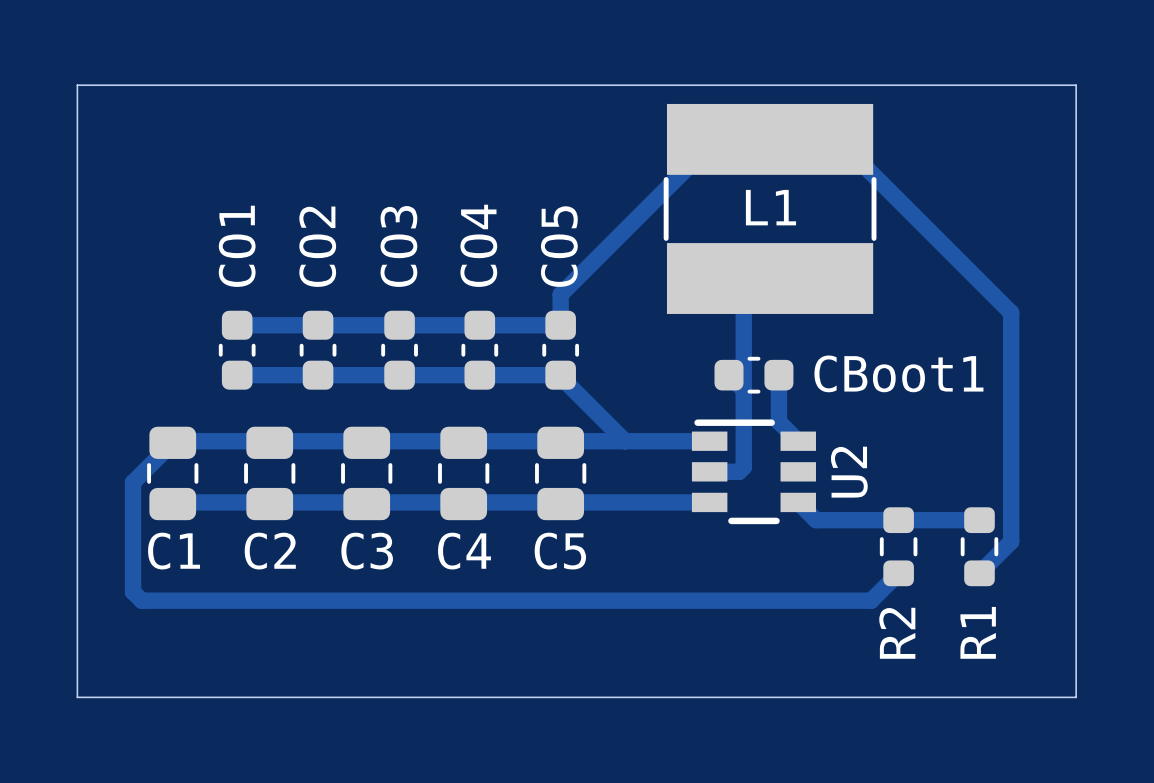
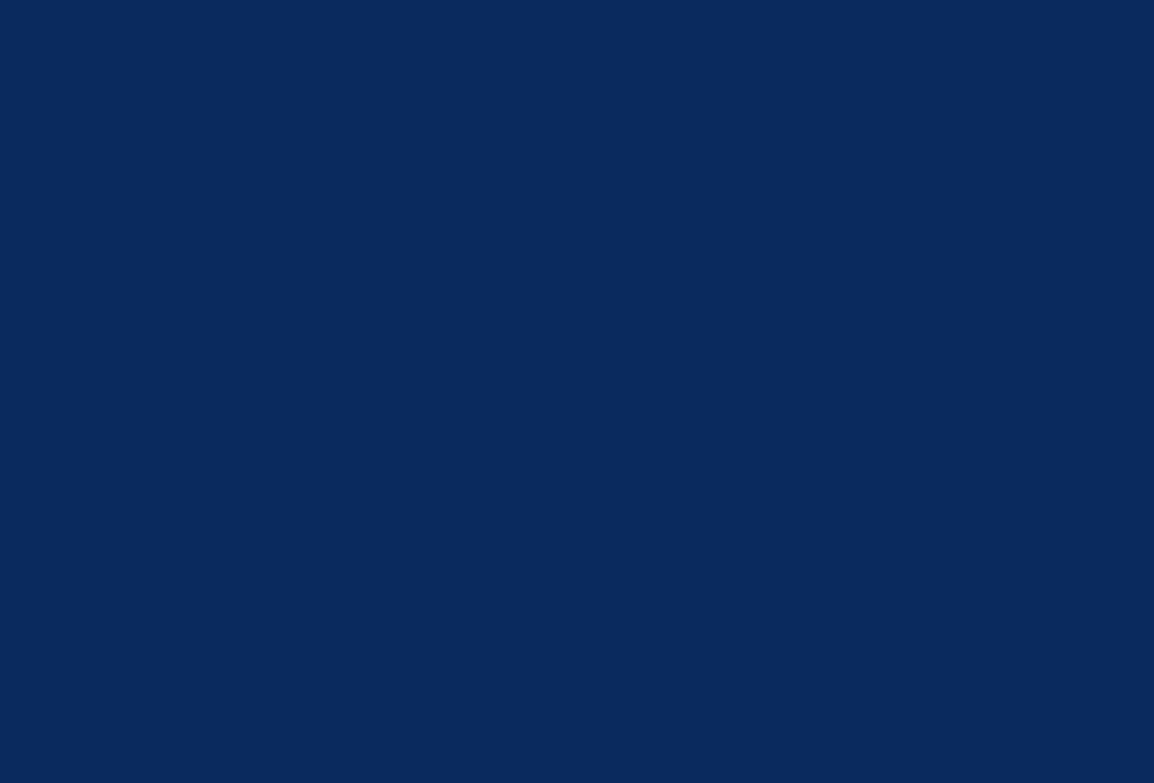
board edge: (77, 85) (1076, 85) (1076, 697) (77, 697) (77, 85) -> none
L1: (770, 208) -> none
track: (770, 278) (743, 304) (743, 467) (739, 471) (709, 471) -> none
track: (237, 325) (560, 325) (560, 294) (715, 139) (837, 139) (1011, 312) (1011, 541) (979, 573) -> none
CO1: (237, 350) -> none
CO2: (318, 350) -> none
CO3: (399, 350) -> none
CO4: (479, 350) -> none
CO5: (560, 350) -> none
track: (237, 375) (559, 375) (625, 441) -> none
CBoot1: (753, 375) -> none
track: (778, 375) (778, 421) (798, 441) -> none
track: (709, 441) (174, 441) (133, 482) (133, 591) (141, 600) (871, 600) (898, 573) -> none
U2: (753, 471) -> none
C1: (172, 473) -> none
C2: (269, 473) -> none
C3: (366, 473) -> none
C4: (463, 473) -> none
C5: (560, 473) -> none
track: (709, 502) (174, 502) (172, 504) -> none
track: (798, 502) (815, 520) (979, 520) -> none
R2: (898, 546) -> none
R1: (979, 546) -> none

